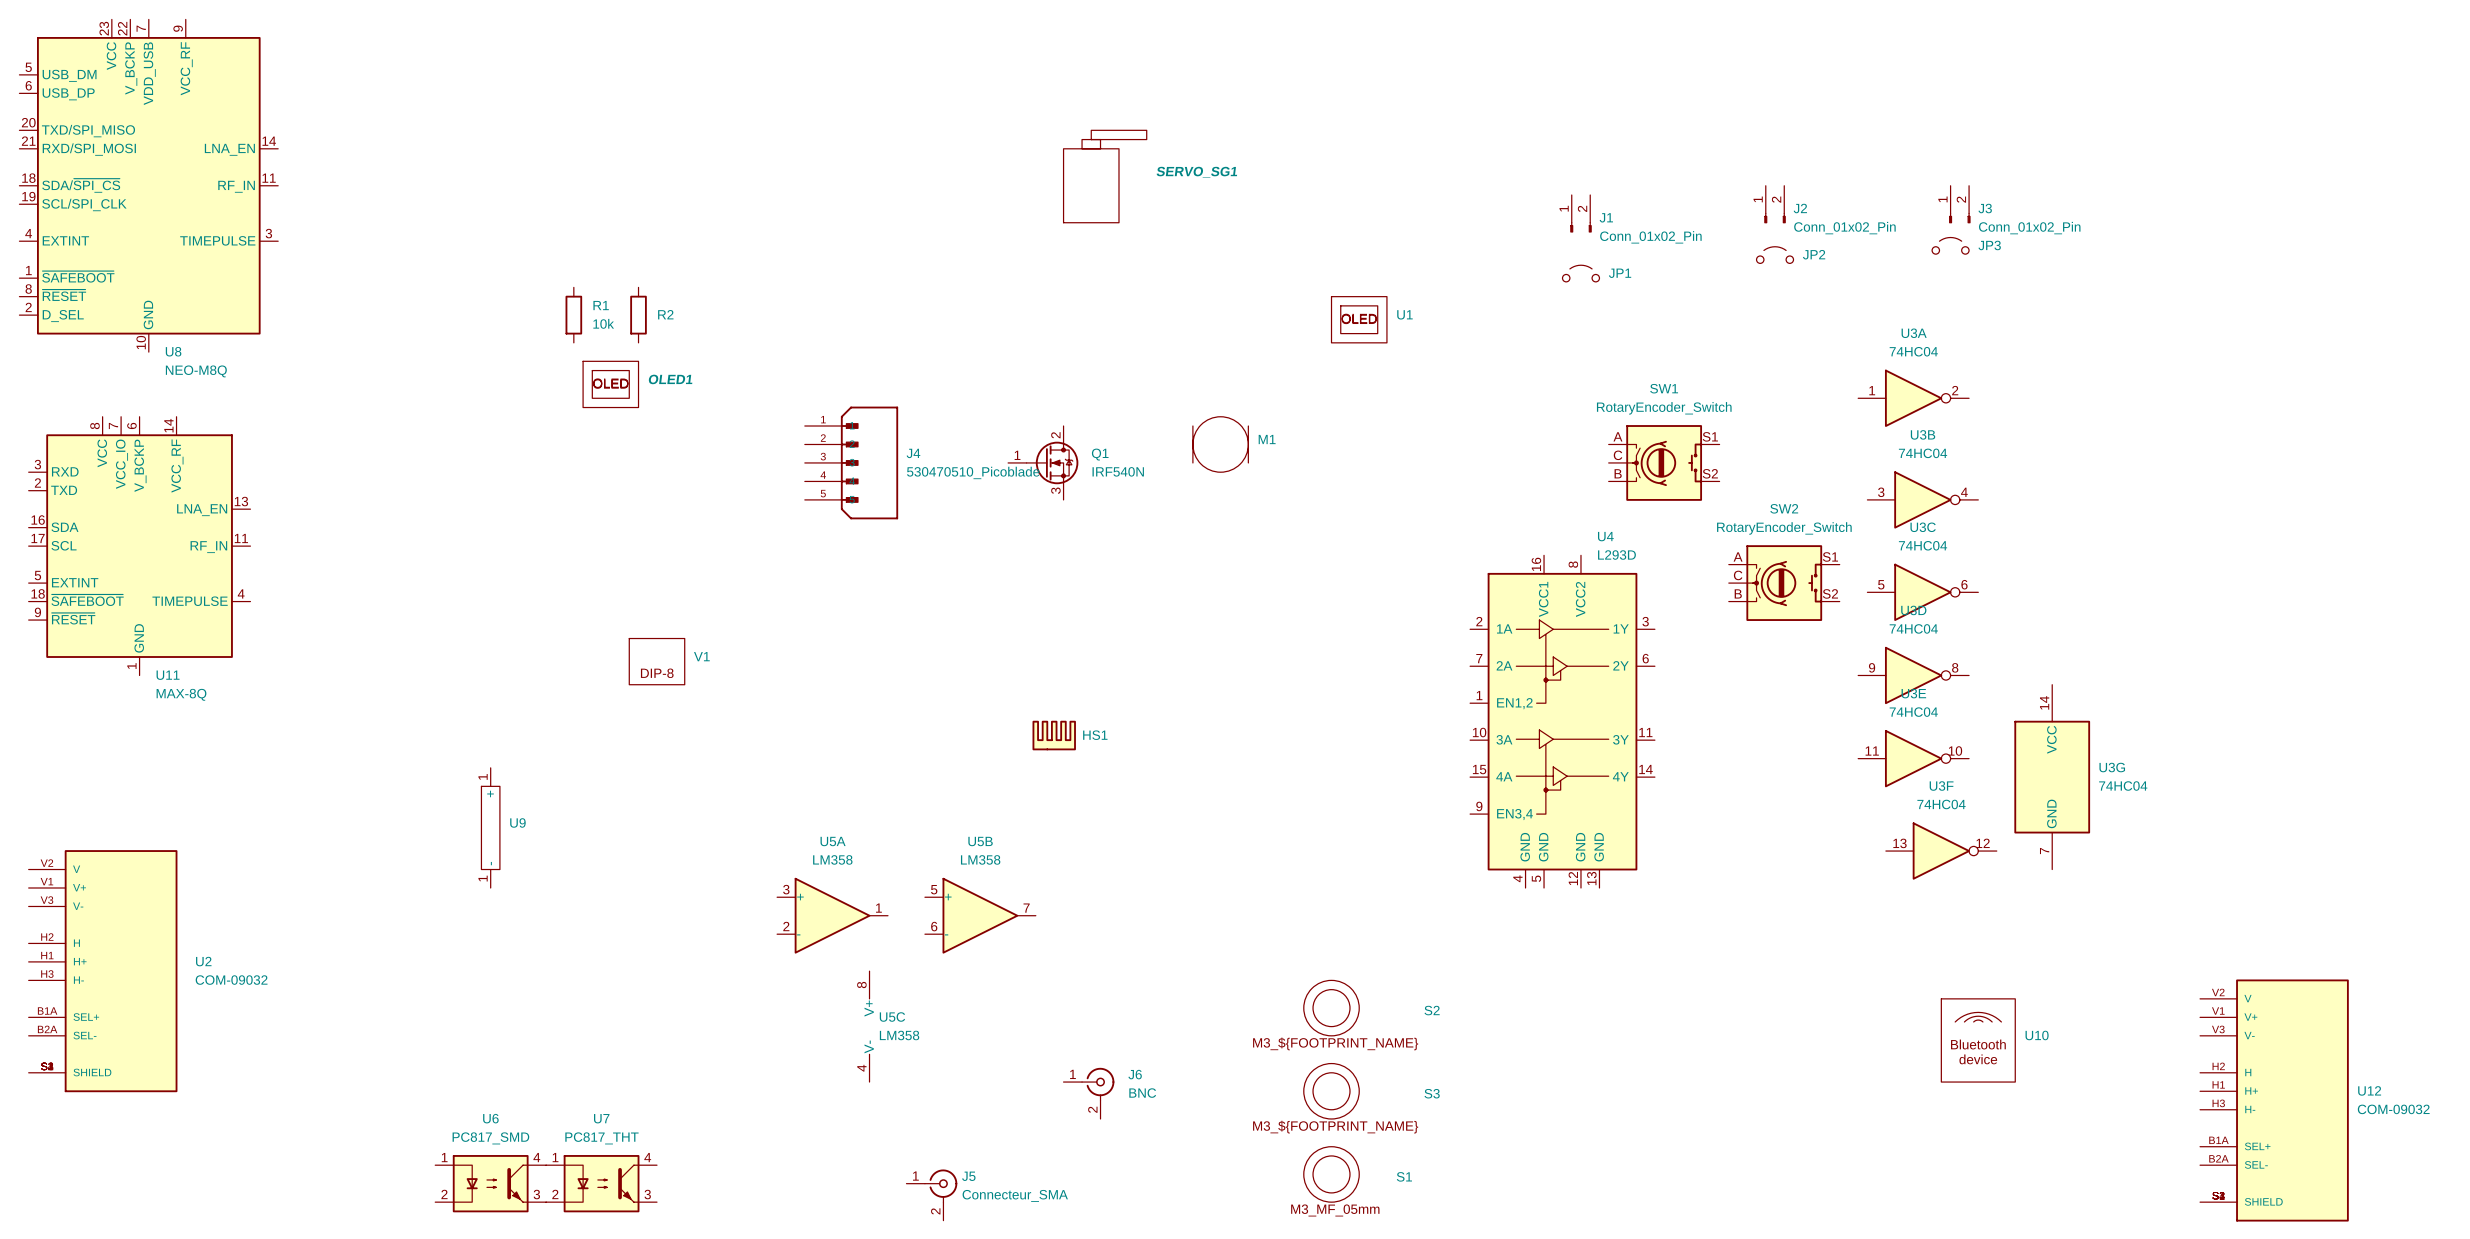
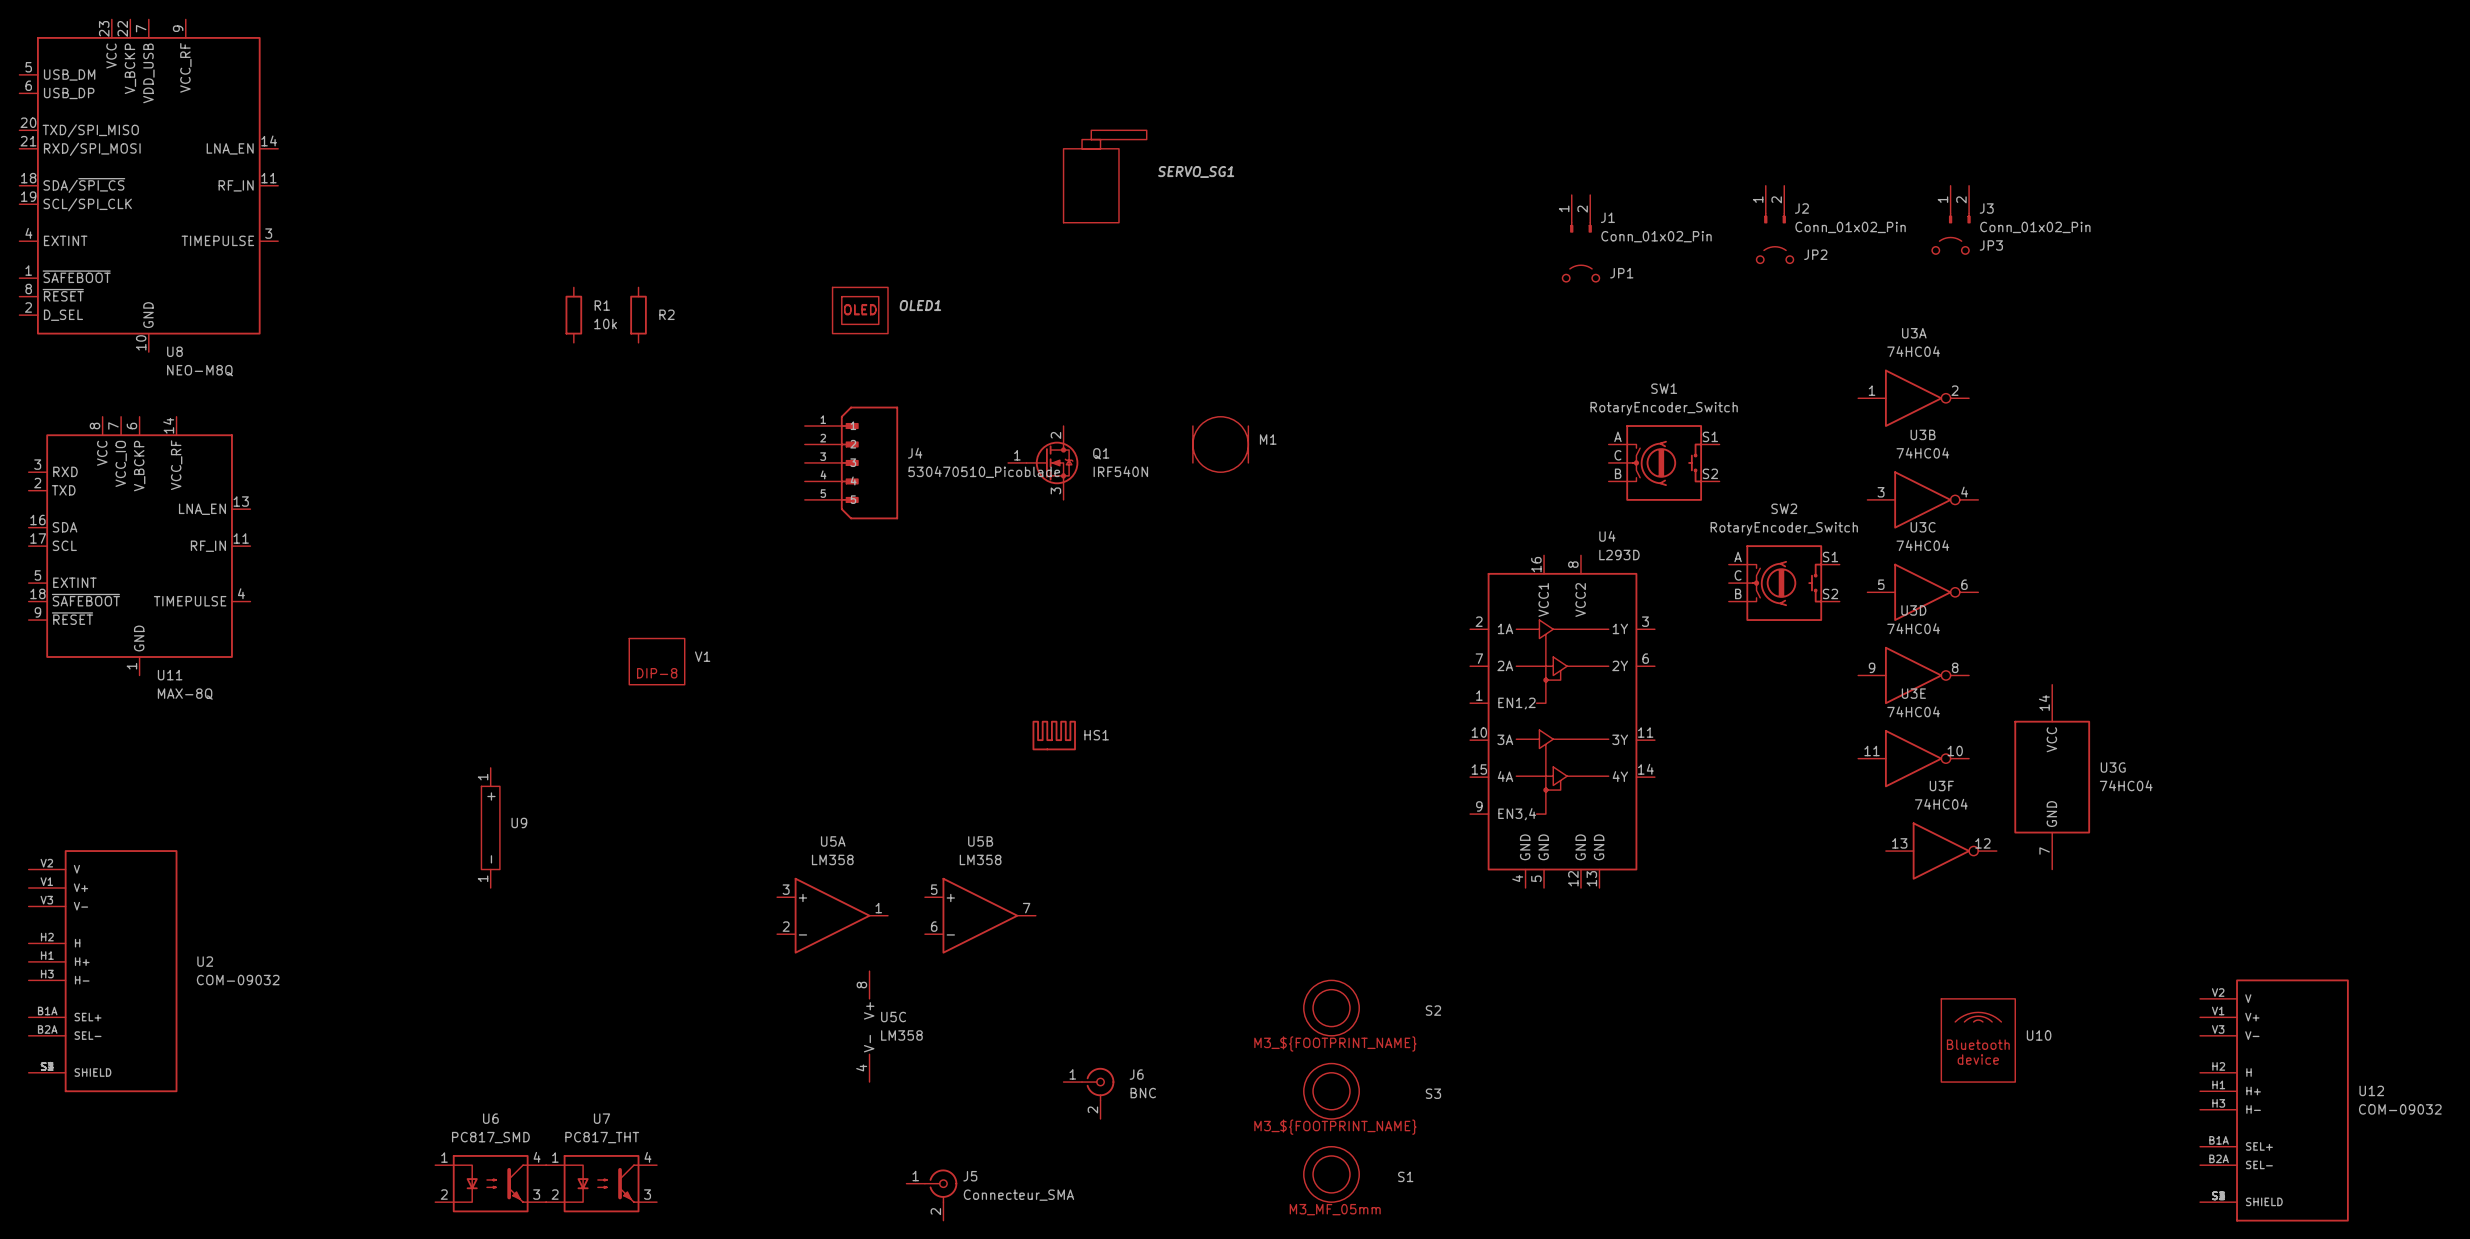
U1: (1359, 319) -> none
OLED1 position: (610, 384) -> (860, 310)

